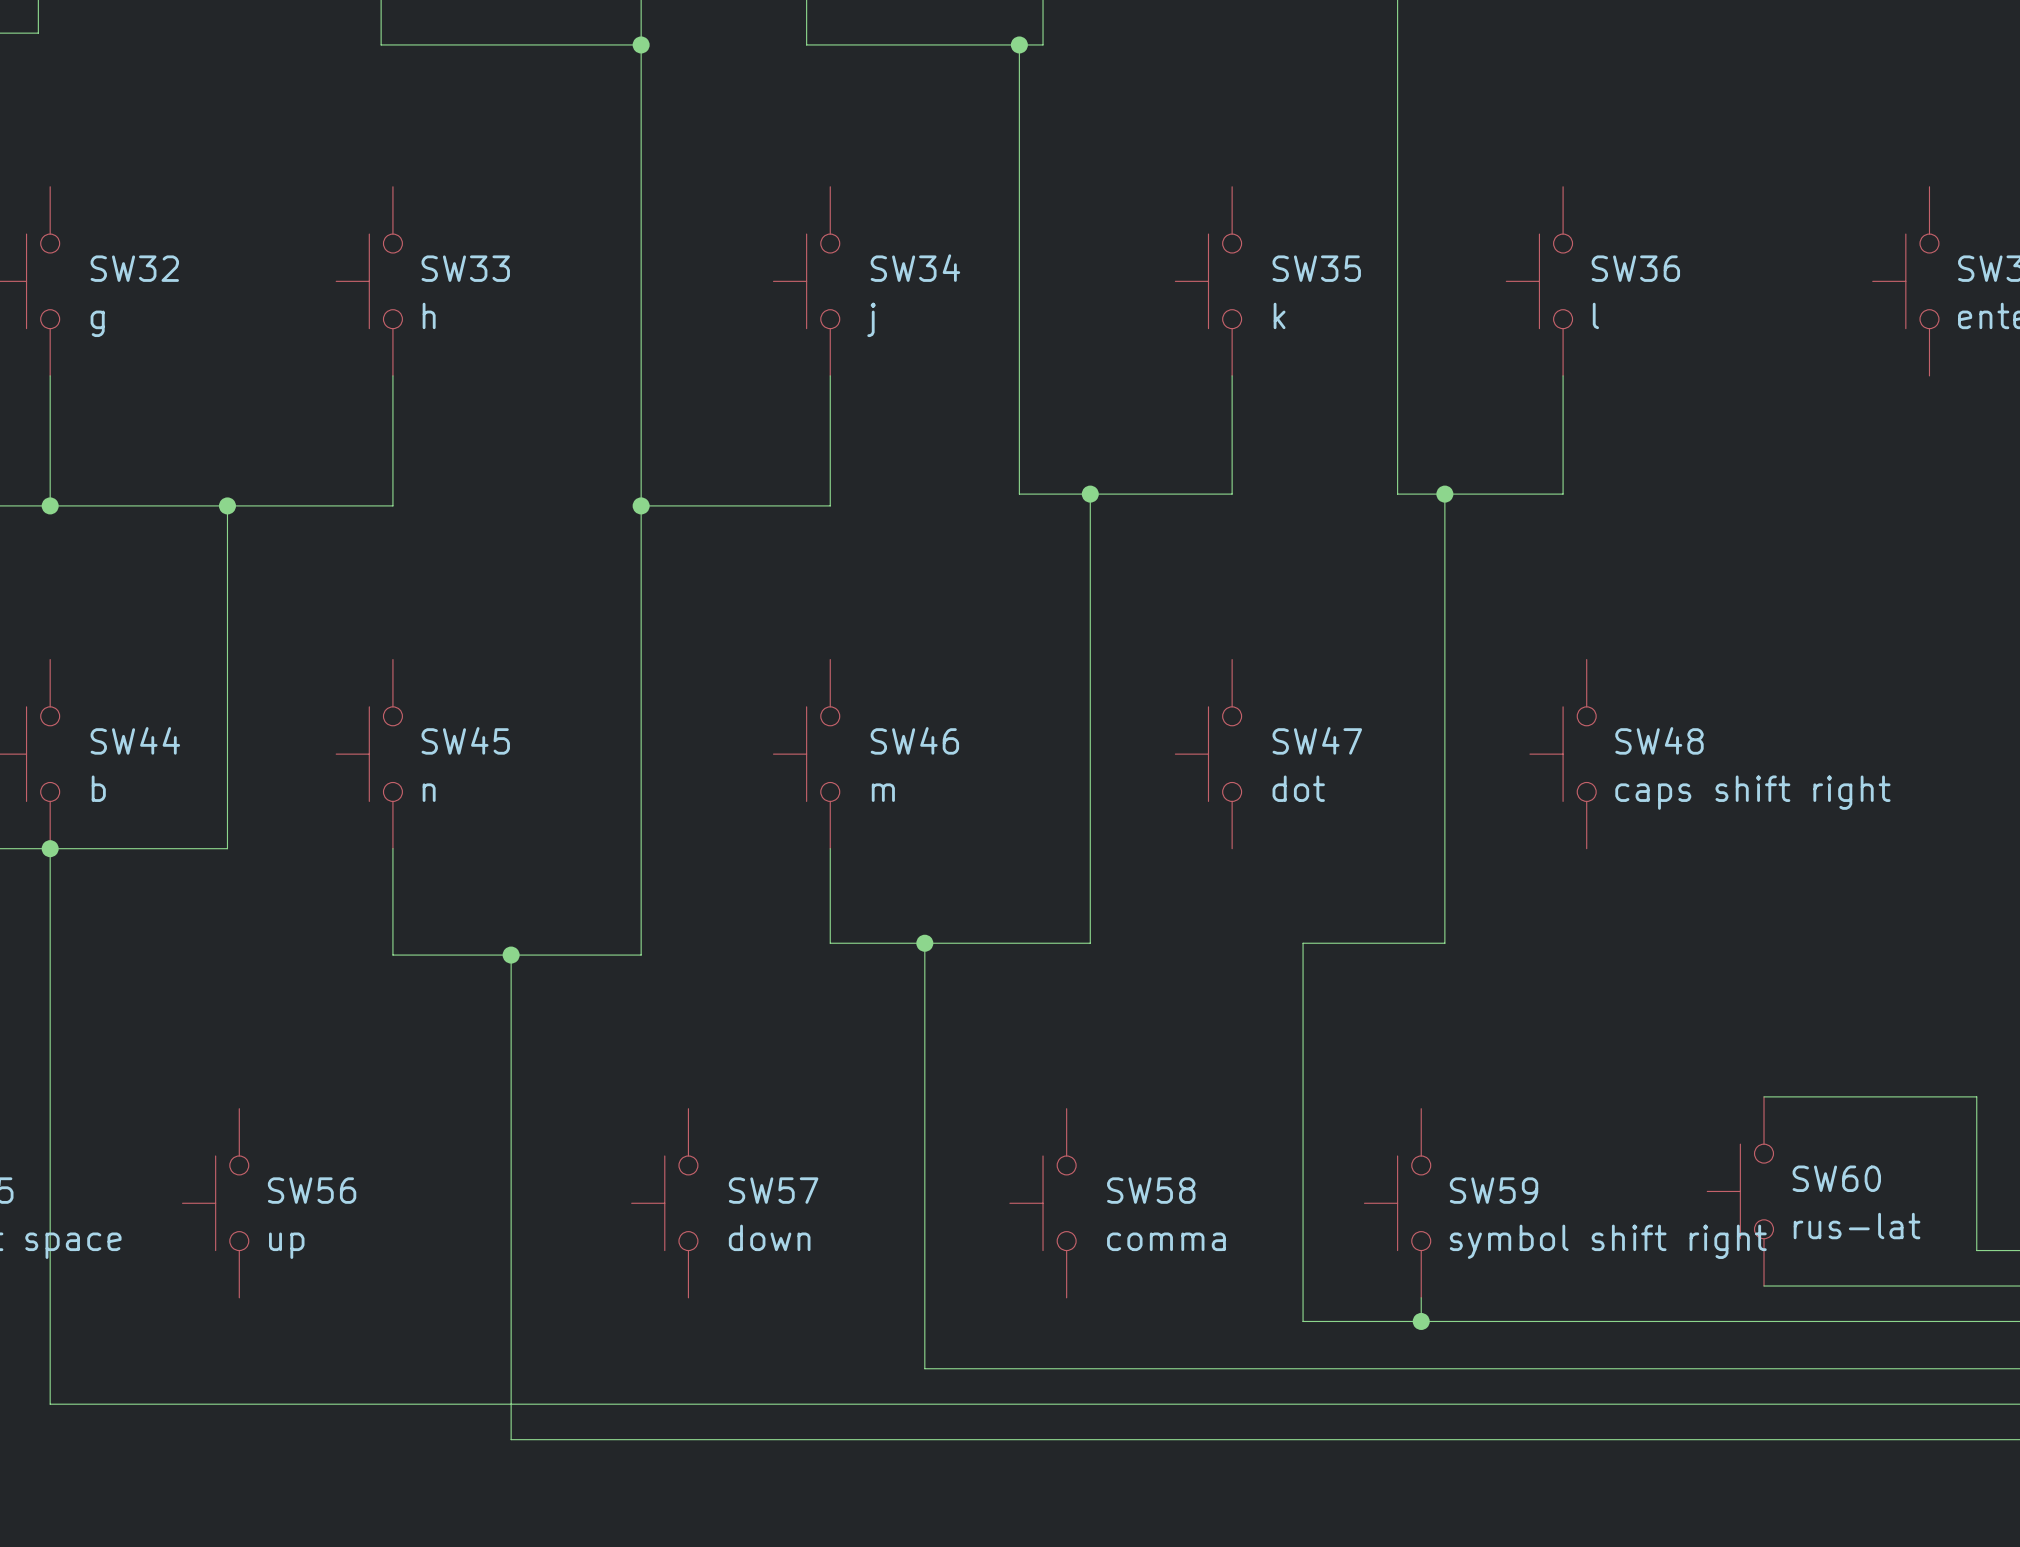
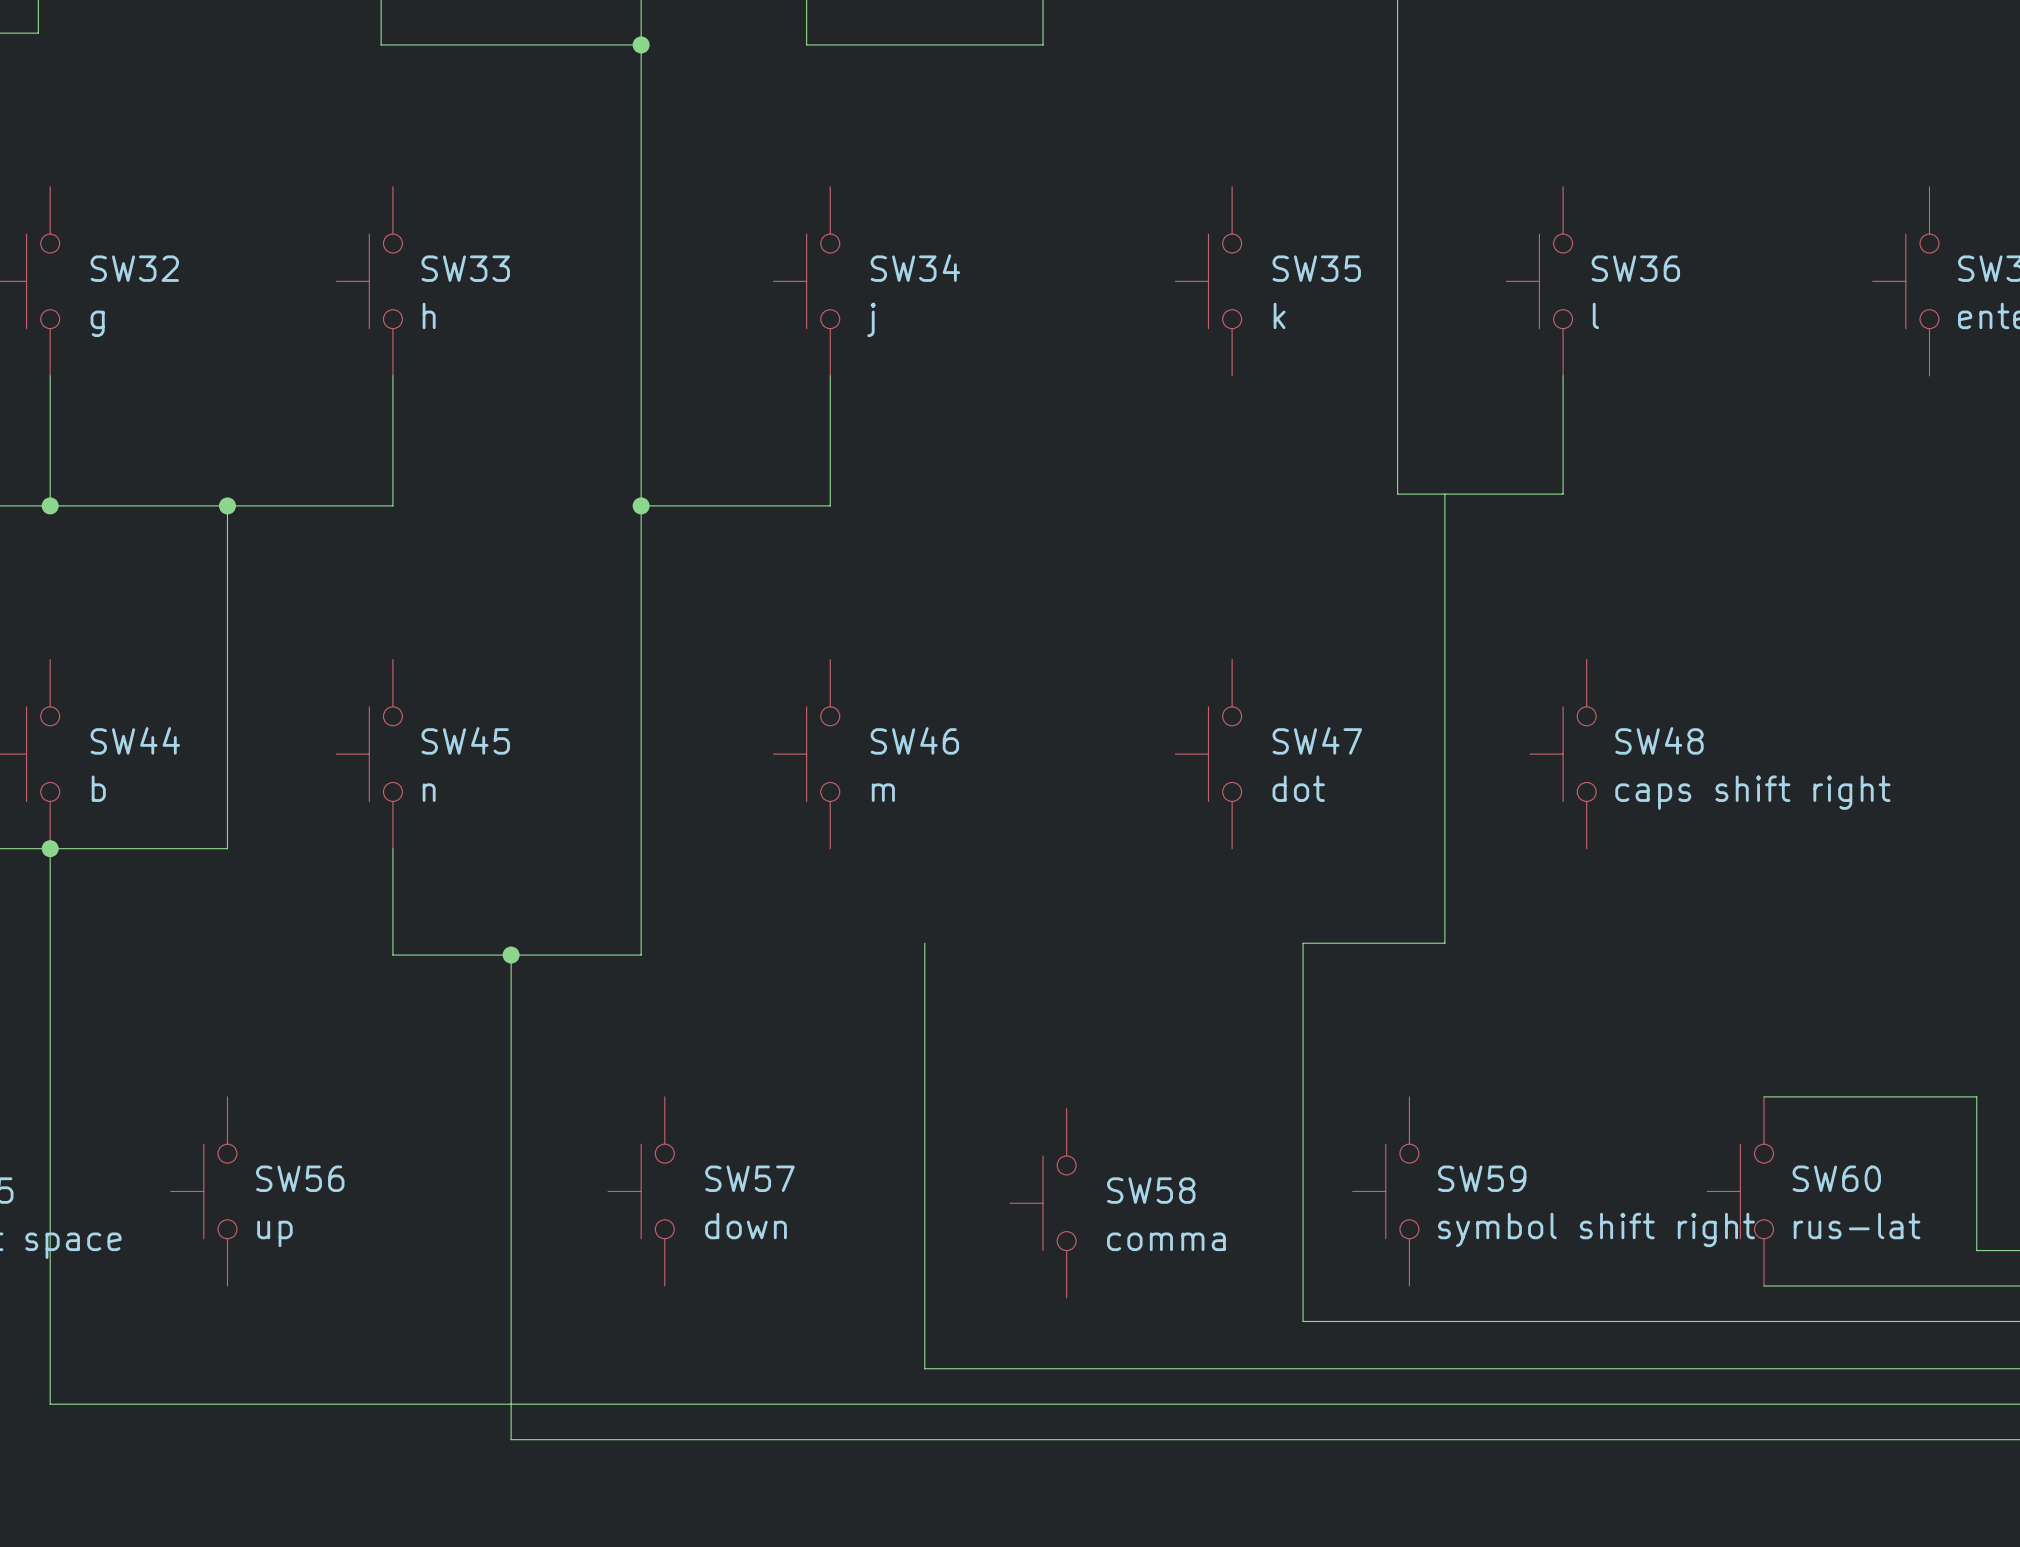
wire: (1019, 44) (1019, 494) (1232, 494) (1232, 375) -> none
junction: (1019, 44) -> none
wire: (1090, 494) (1090, 943) (830, 943) (830, 848) -> none
junction: (1090, 494) -> none
junction: (1444, 494) -> none
junction: (924, 943) -> none
SW56 position: (215, 1203) -> (203, 1191)
SW57 position: (664, 1203) -> (641, 1191)
SW59 position: (1397, 1203) -> (1385, 1191)
wire: (1421, 1297) (1421, 1321) -> none
junction: (1421, 1321) -> none

